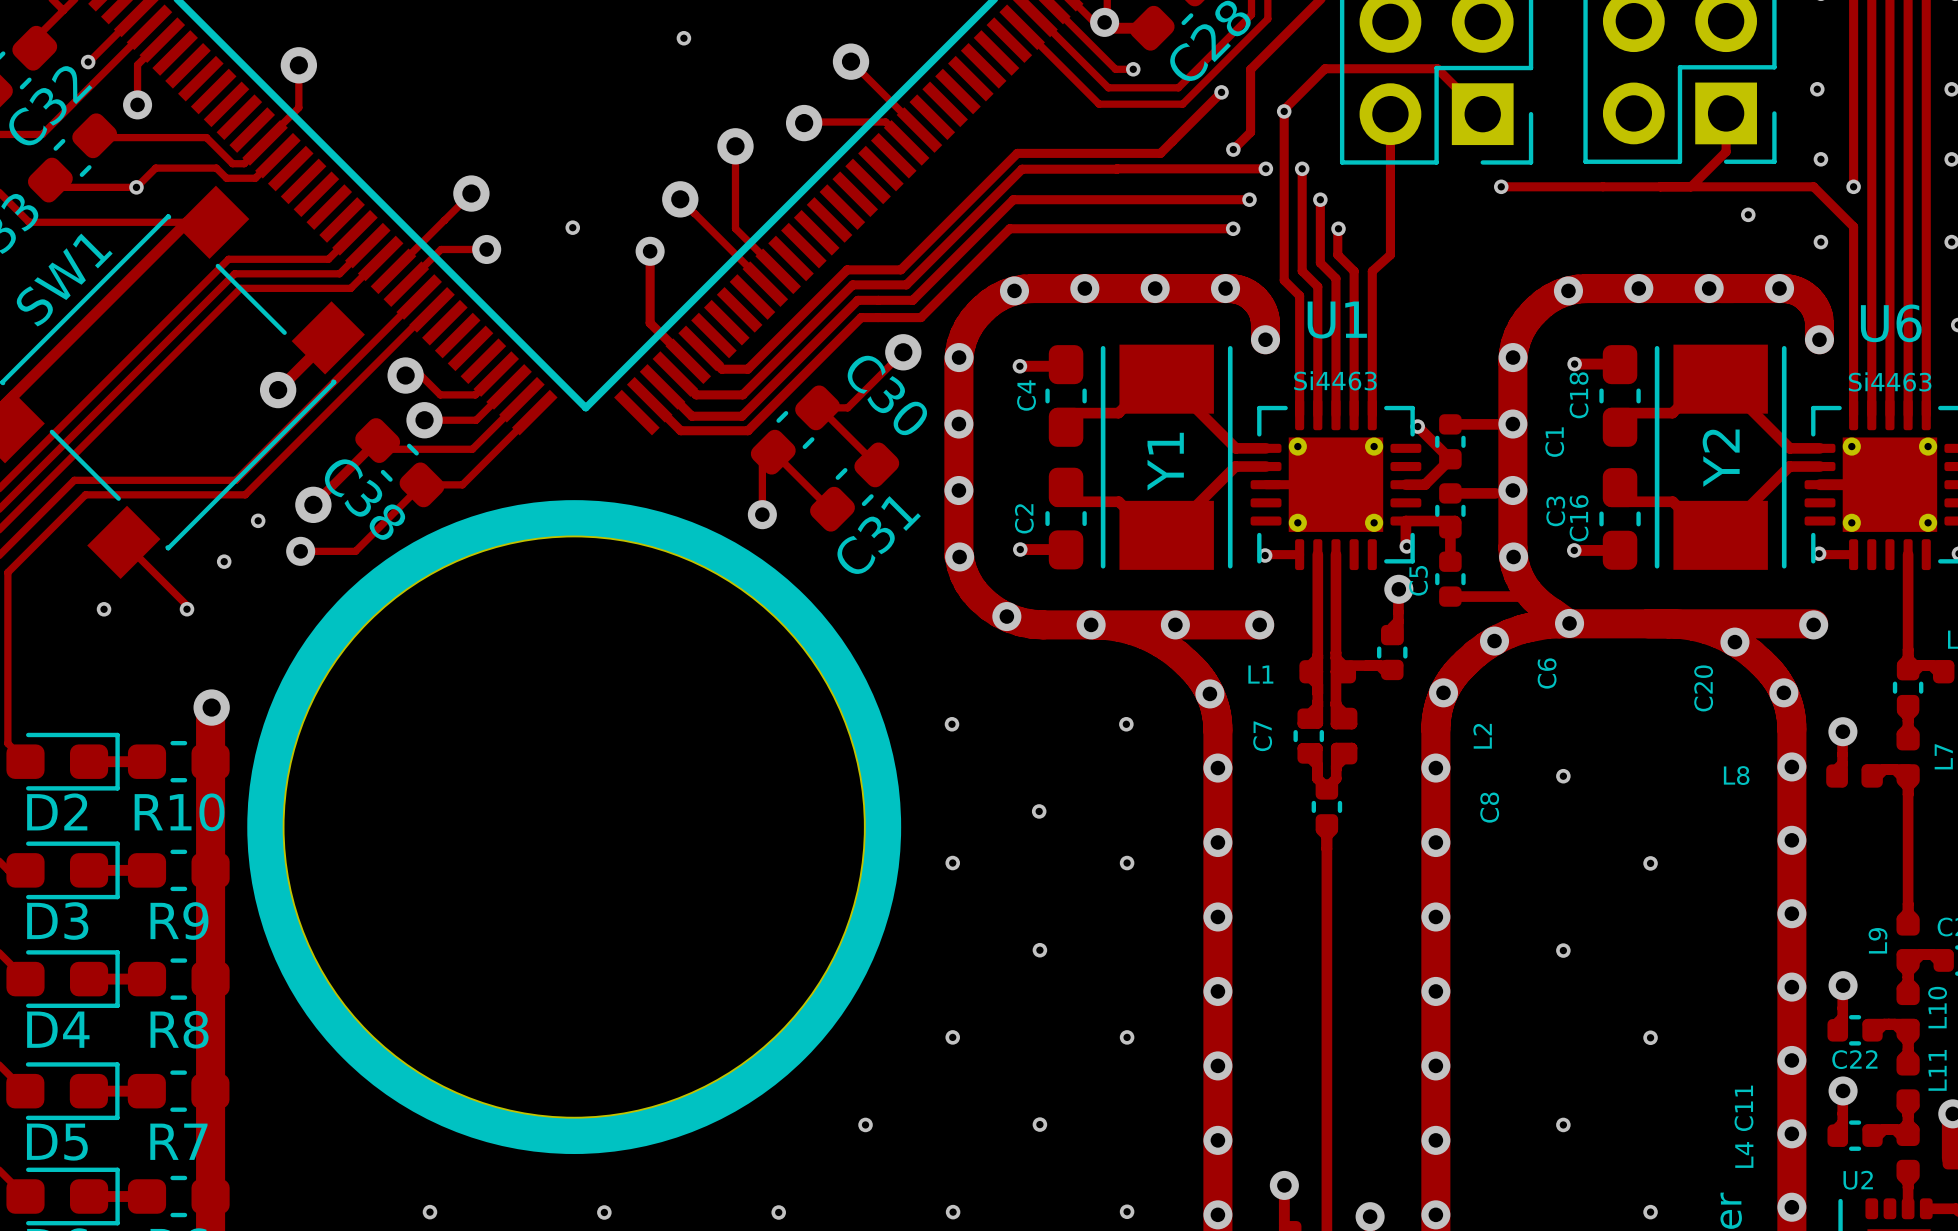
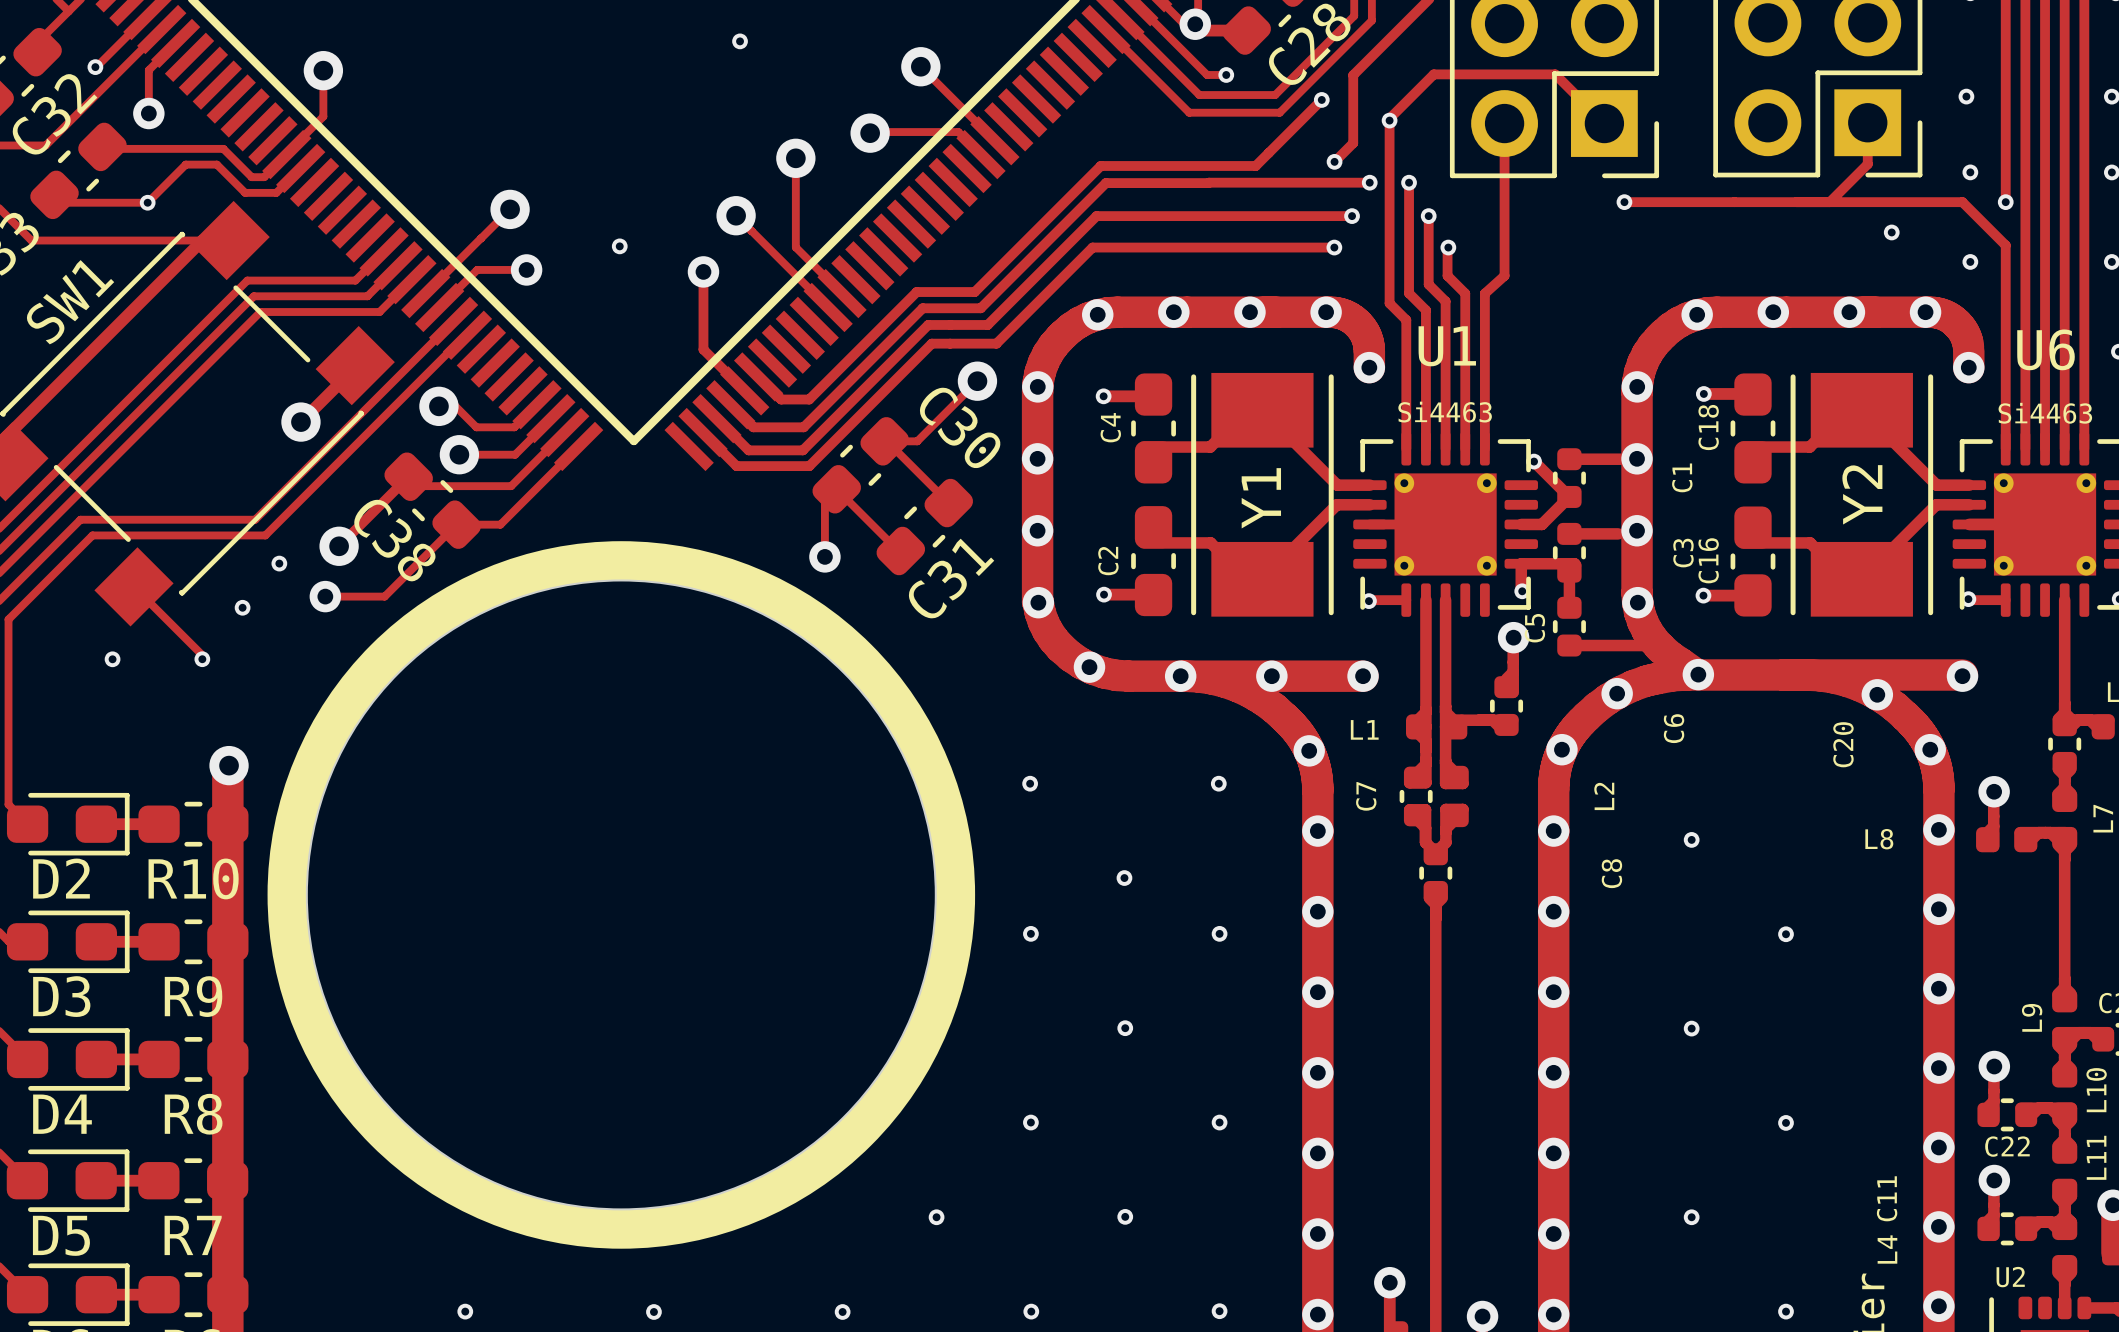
track: (155, 168) (216, 168) -> (168, 181) (185, 164) (216, 164) (234, 181)

